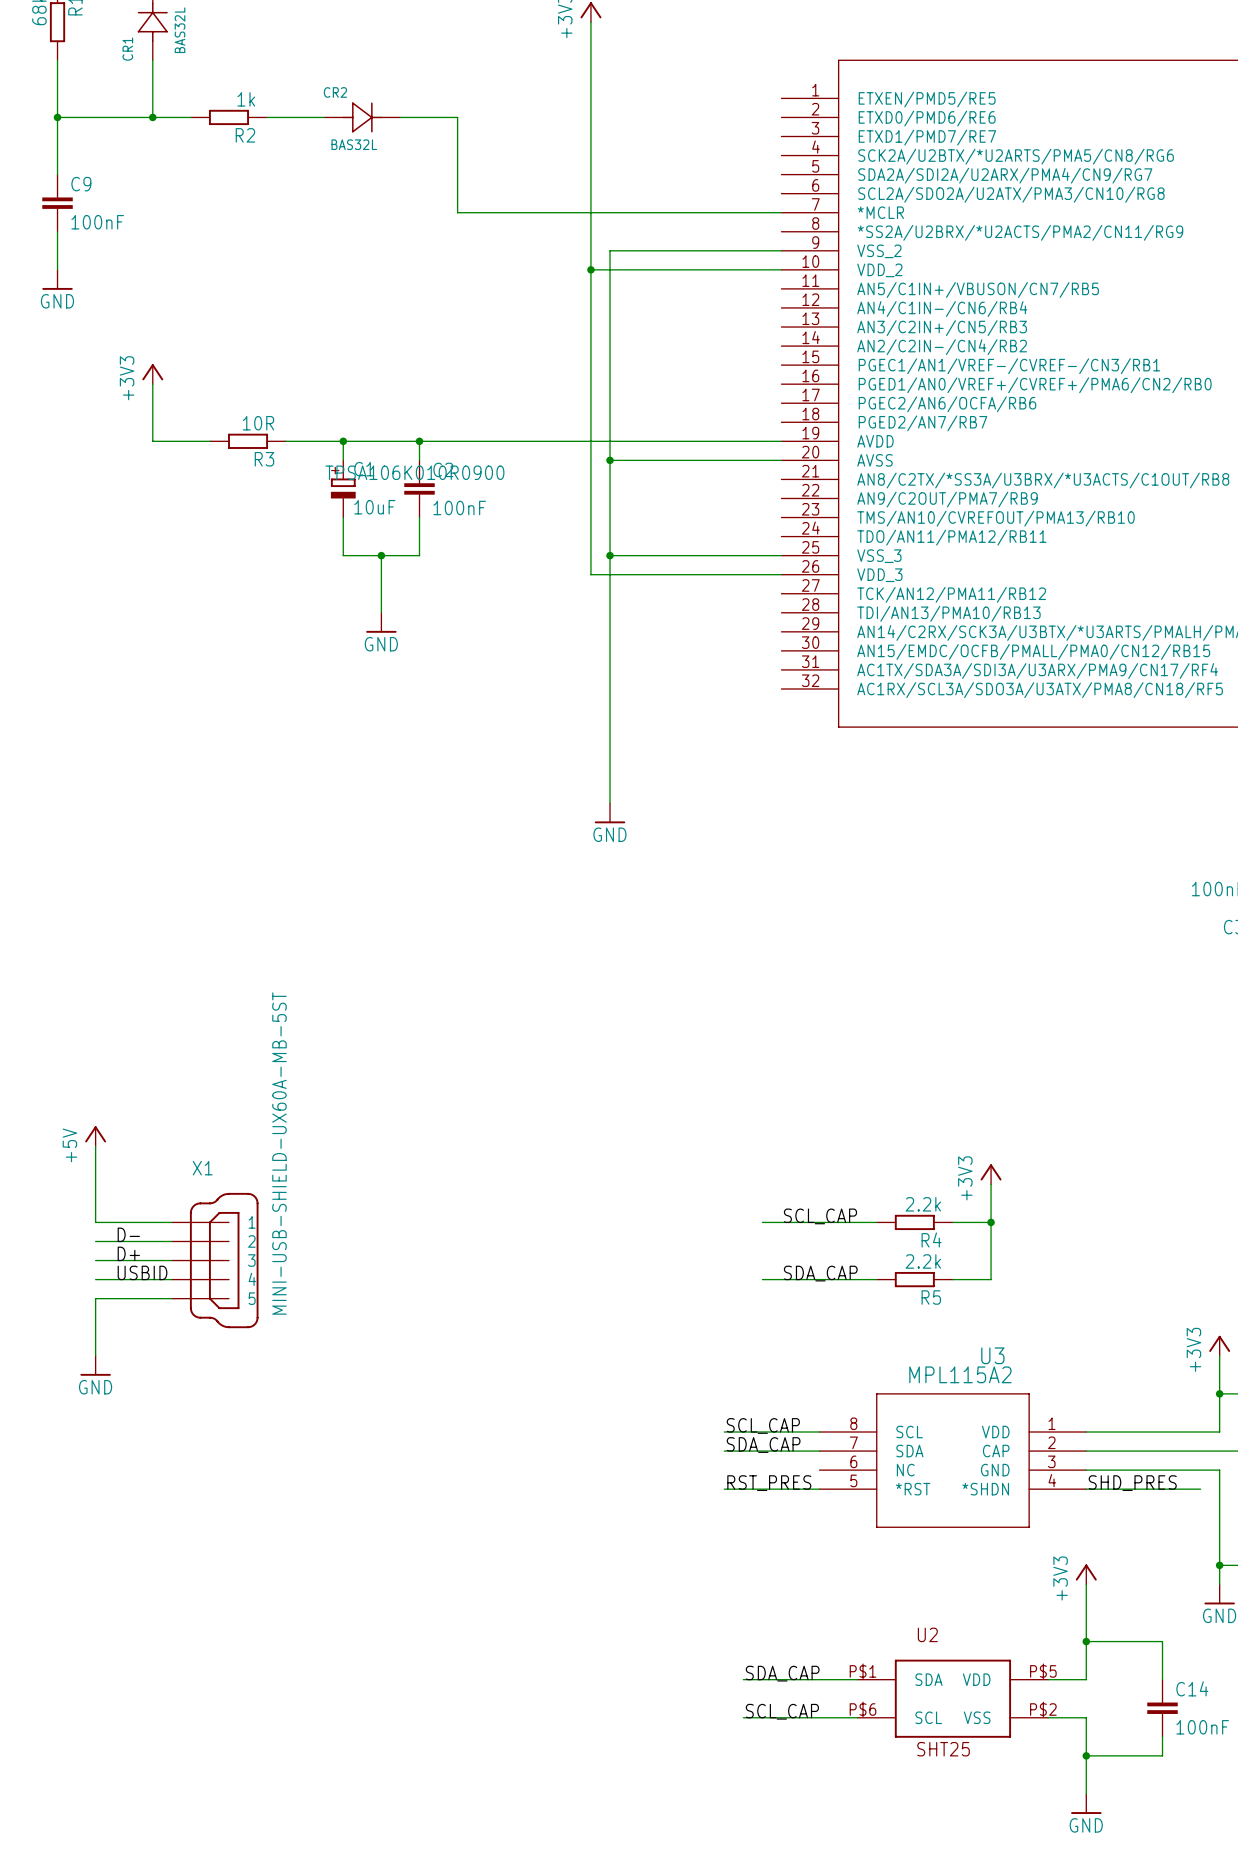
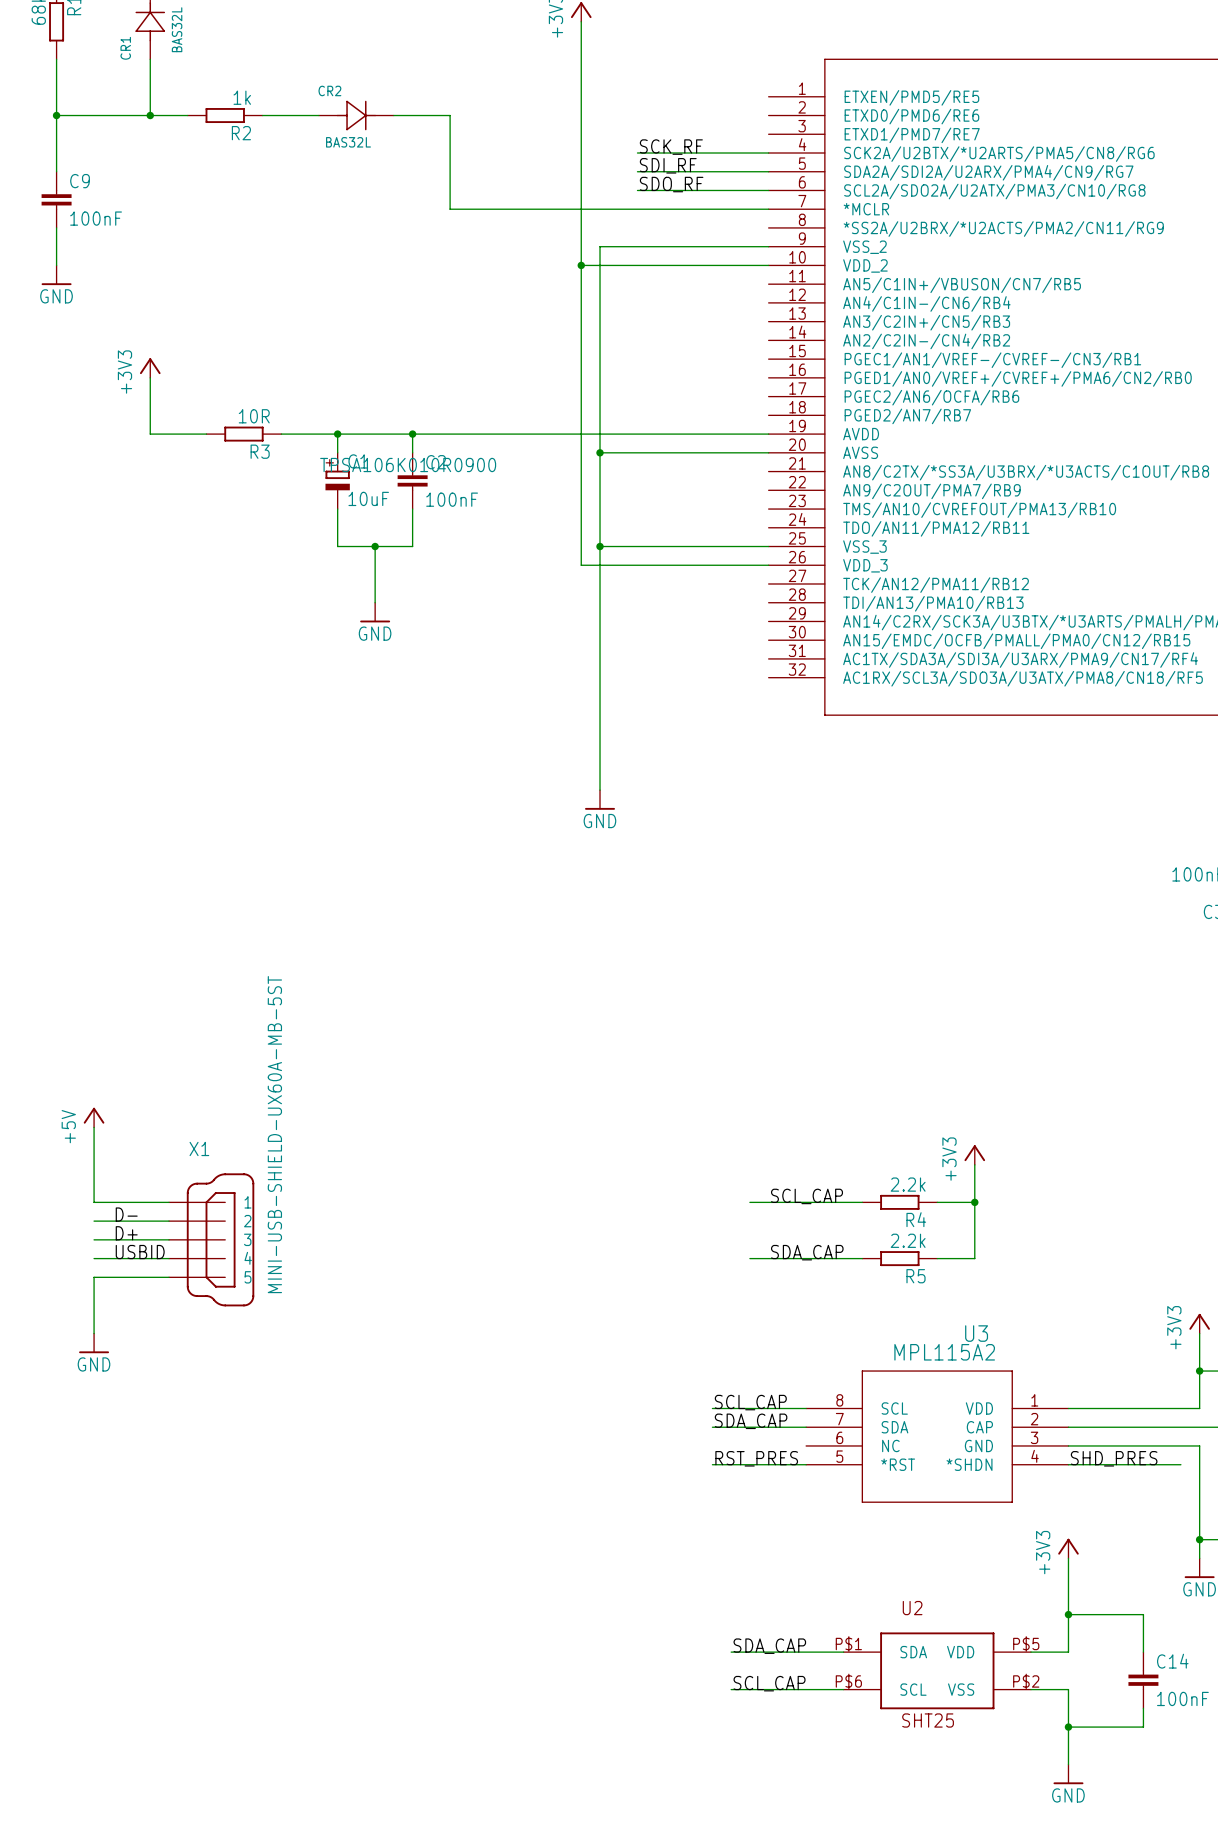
label: none -> SCK_RF (671, 147)
wire: none -> (637, 153) (768, 153)
label: none -> SDI_RF (668, 165)
wire: none -> (637, 171) (768, 171)
label: none -> SDO_RF (671, 184)
wire: none -> (637, 190) (768, 190)

